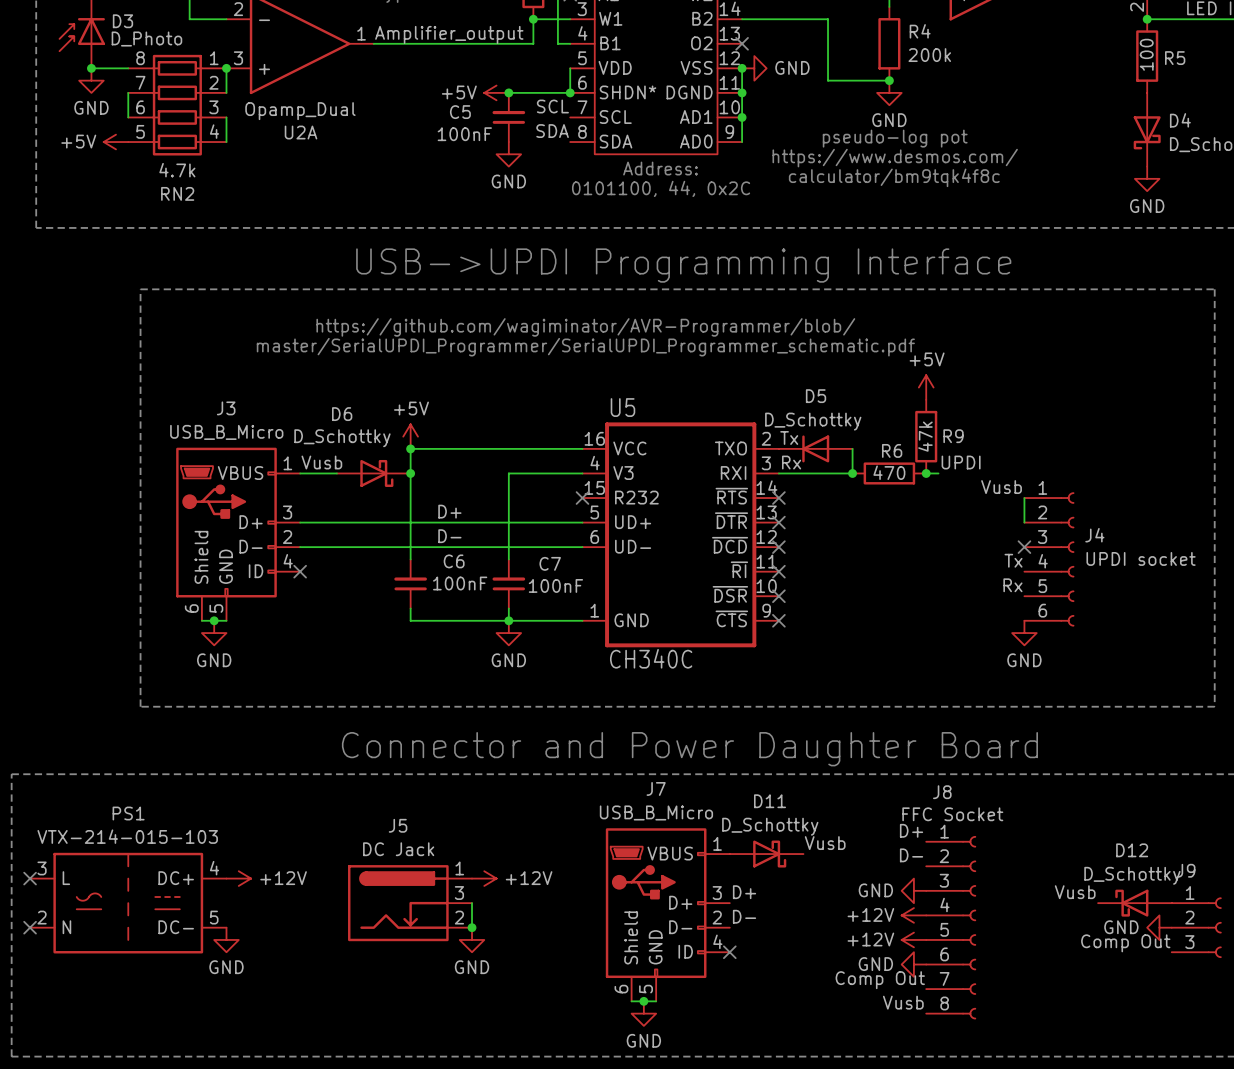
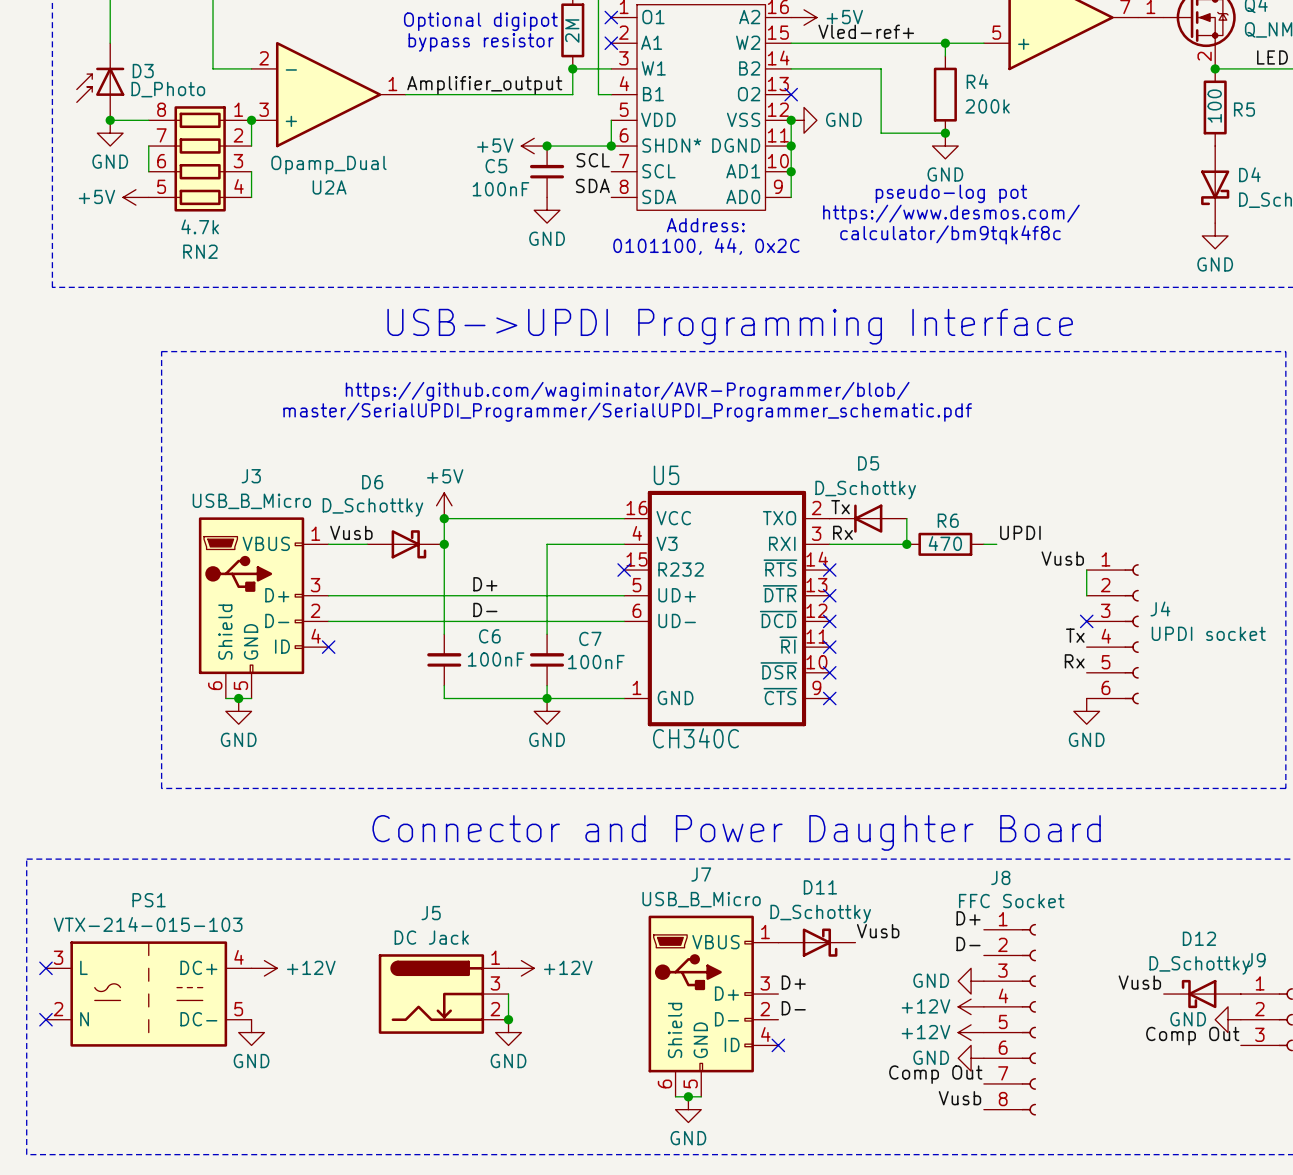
power symbol: +5V (926, 387) -> none
R9: 47k (926, 436) -> none
junction: (926, 473) -> none

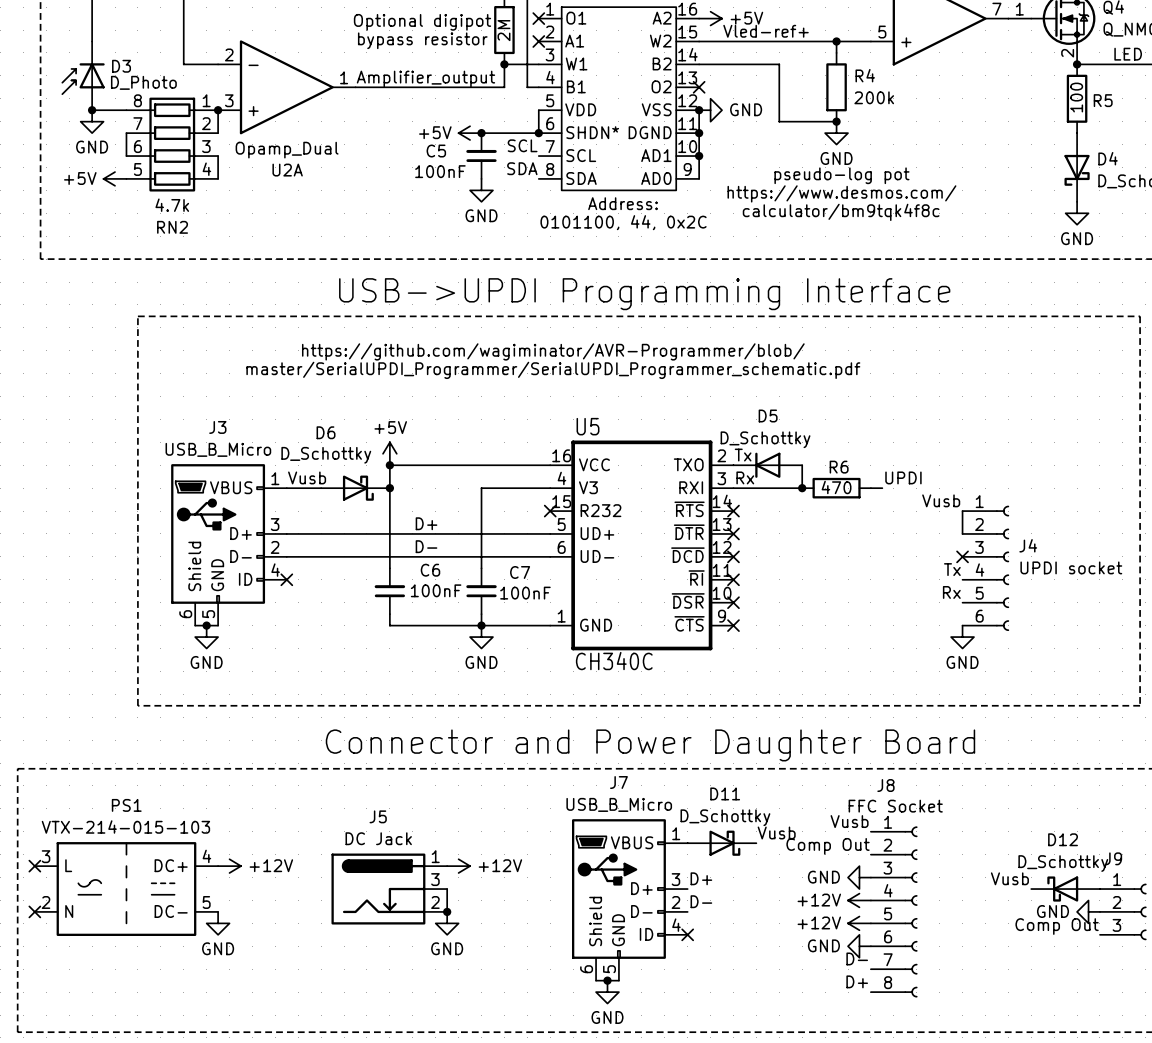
label: D+ (968, 918) -> Vusb (849, 821)
label: D- (968, 944) -> Comp Out (828, 846)
label: Comp Out (935, 1074) -> D- (857, 958)
label: Vusb (959, 1098) -> D+ (857, 981)

